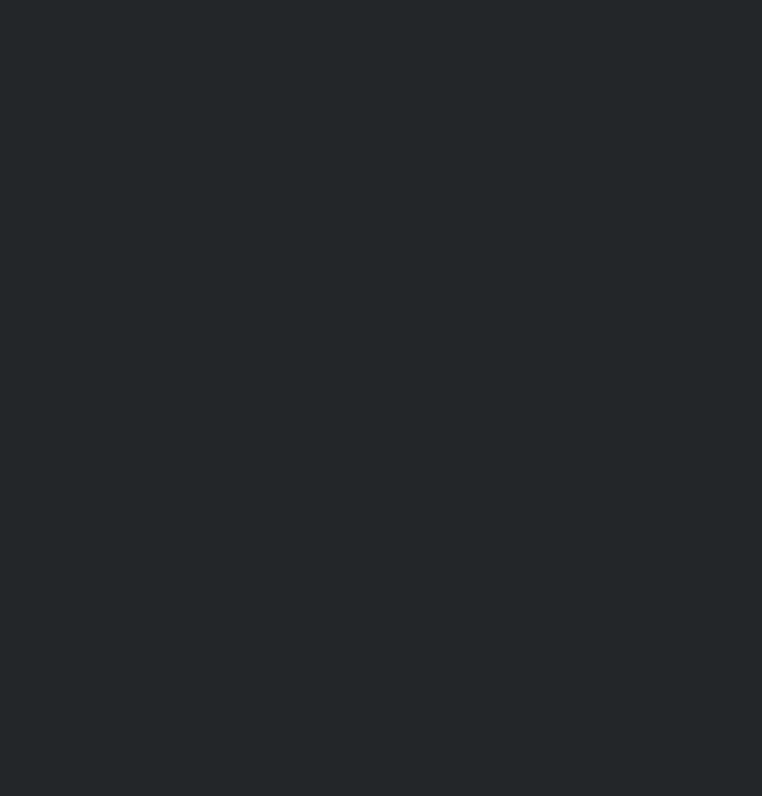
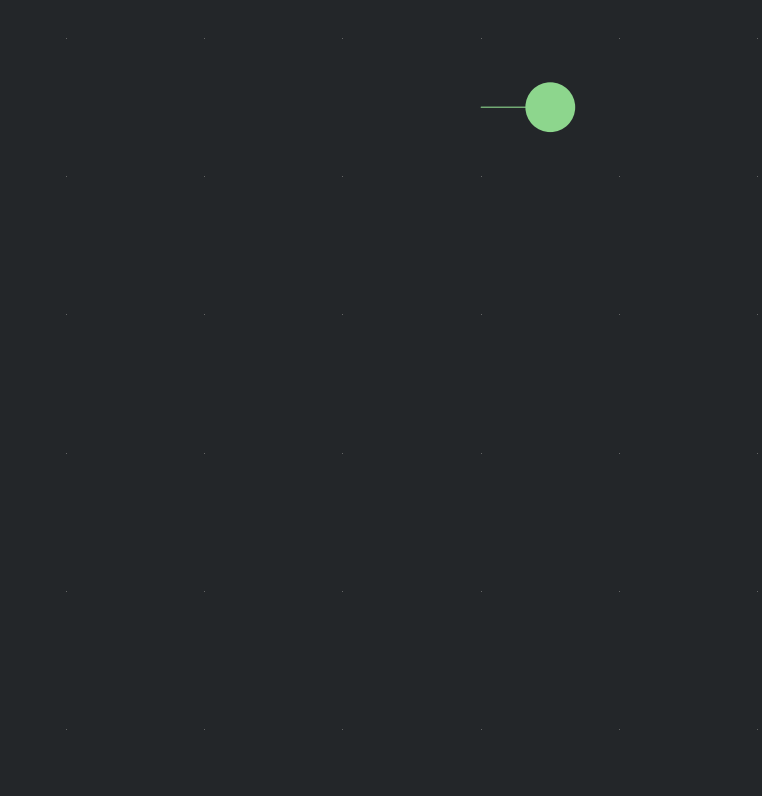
wire: none -> (481, 107) (550, 107)
junction: none -> (550, 107)

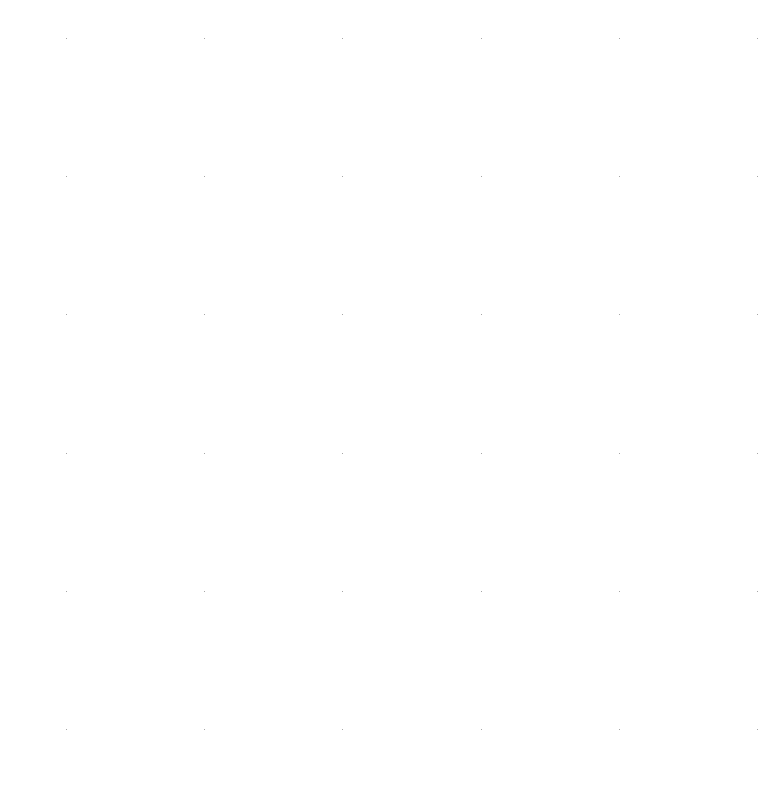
wire: (481, 107) (550, 107) -> none
junction: (550, 107) -> none

